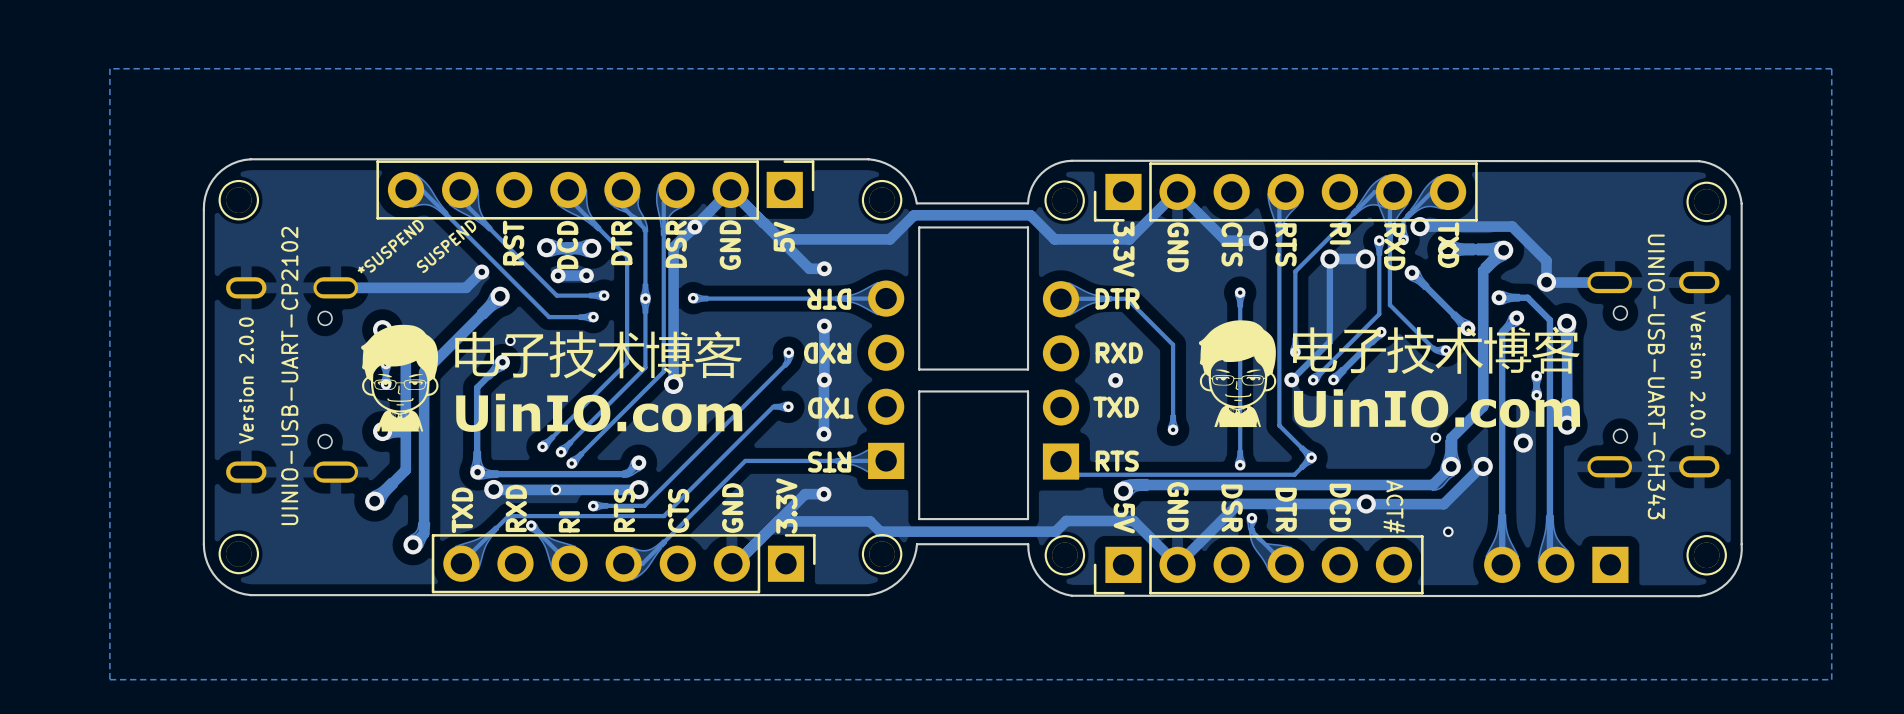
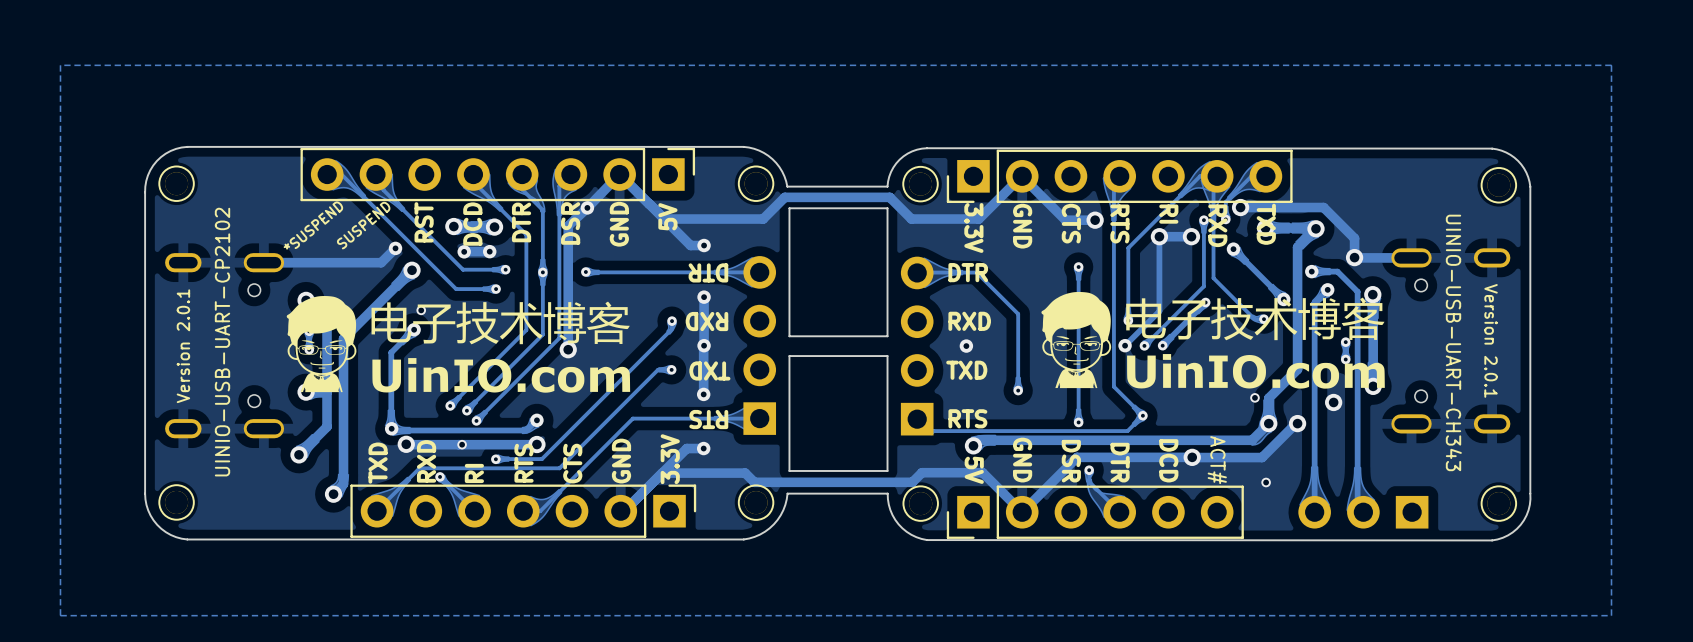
text: Version 2.0.0 (1698, 374) -> Version 2.0.1 (1491, 340)
text: Version 2.0.0 (246, 380) -> Version 2.0.1 (183, 346)

